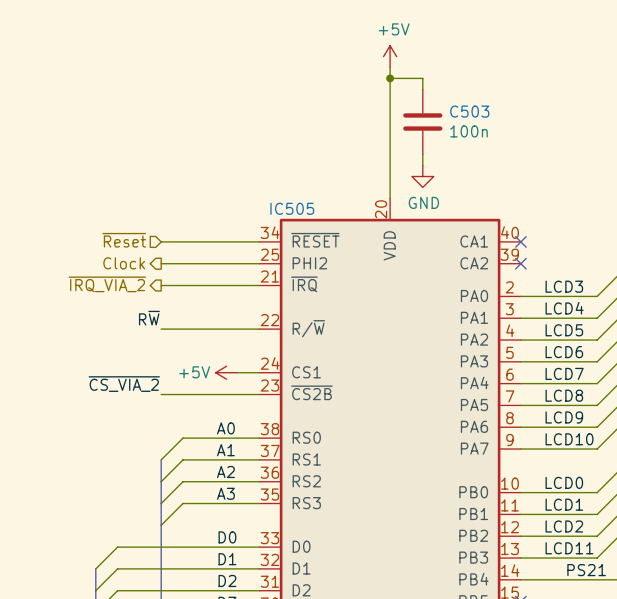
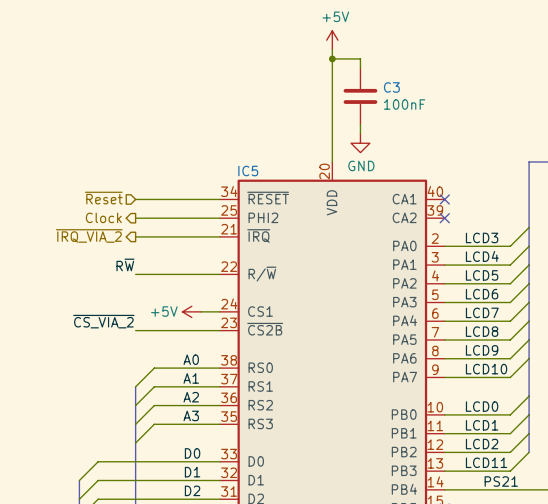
C503 name: C503 (469, 111) -> C3 (391, 87)
C503 value: 100n (468, 131) -> 100nF (404, 104)
IC505 name: IC505 (292, 208) -> IC5 (248, 171)

